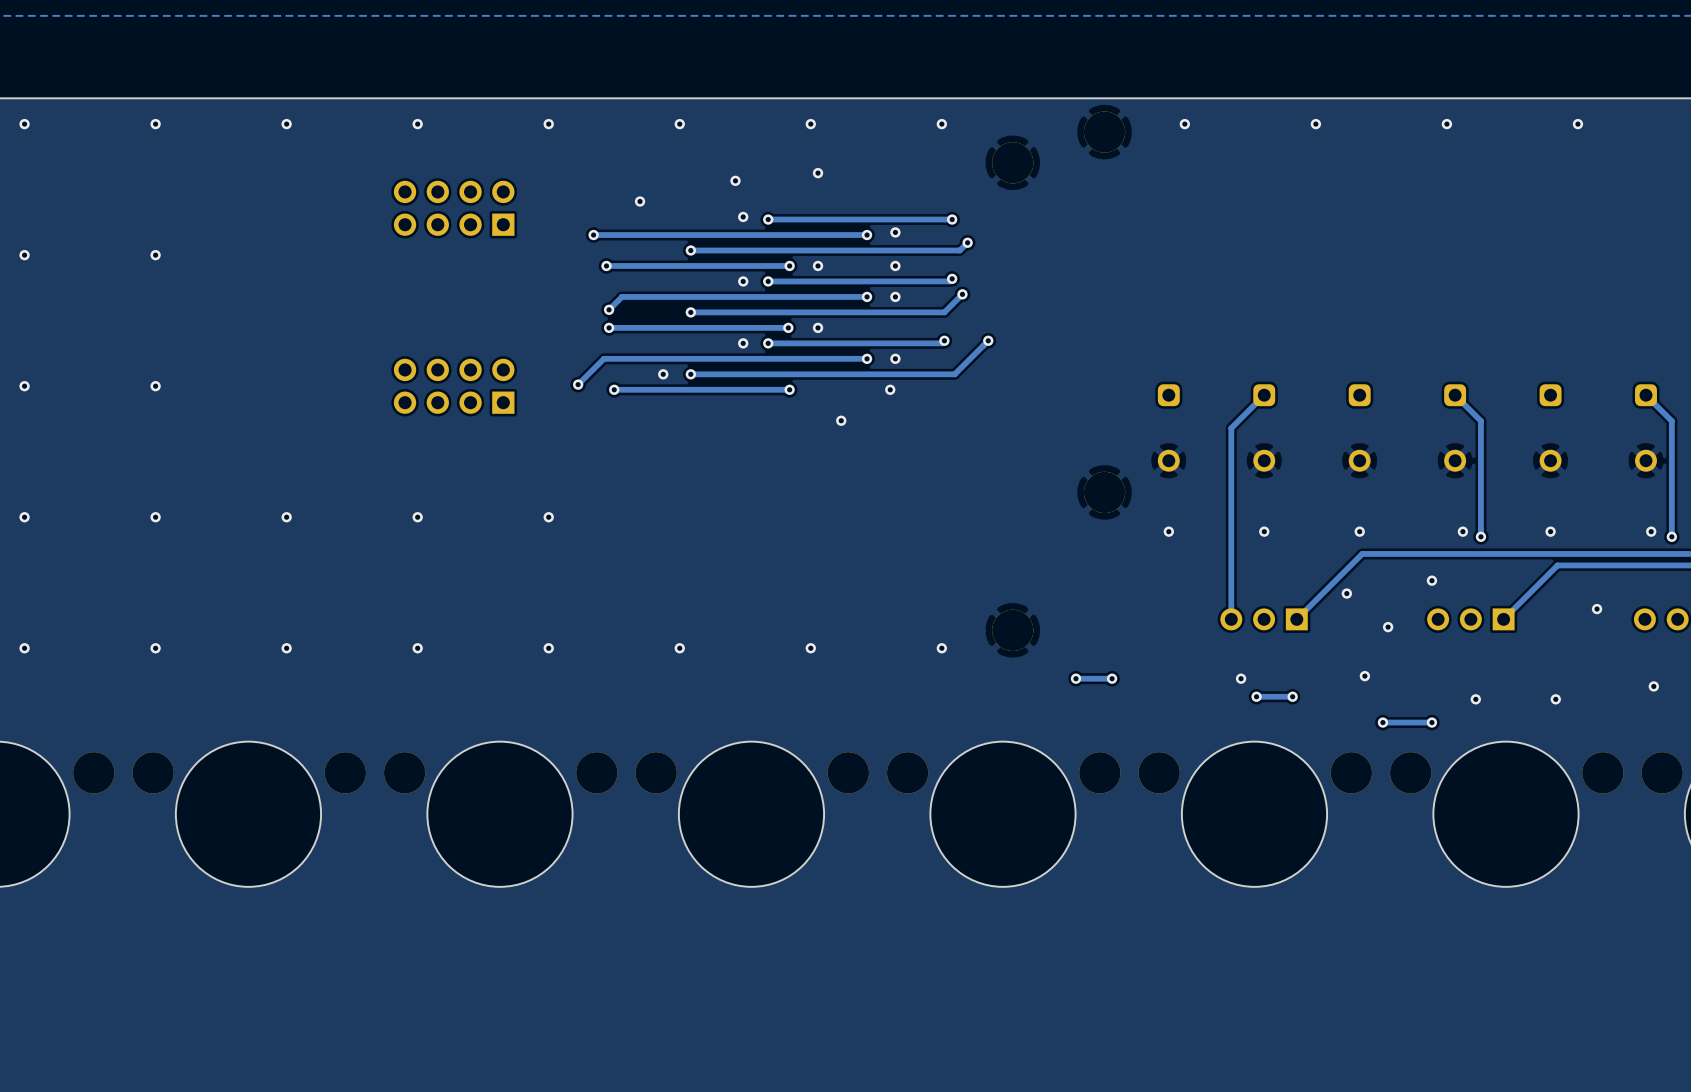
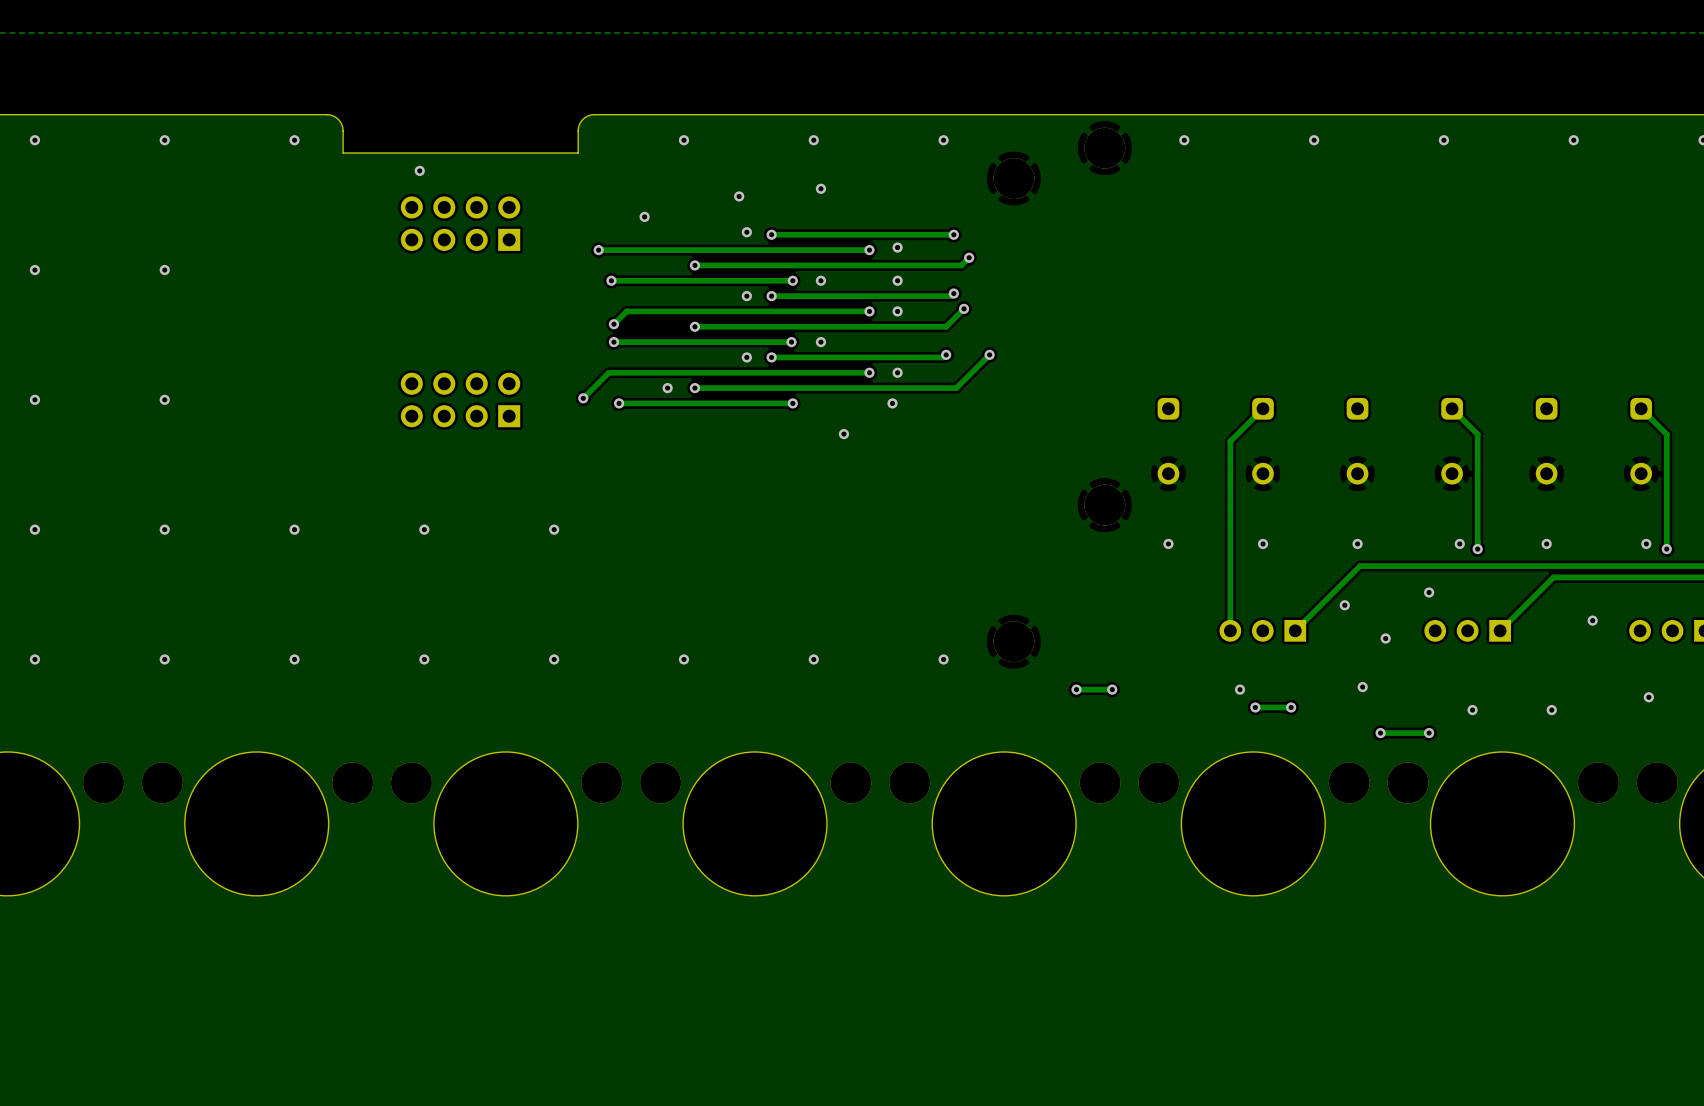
board edge: (589, 98) (319, 98) -> (594, 114) (586, 116) (579, 124) (578, 153) (343, 153) (341, 124) (334, 116) (326, 114)
via position: (417, 124) -> (419, 170)
via: (548, 124) -> none

